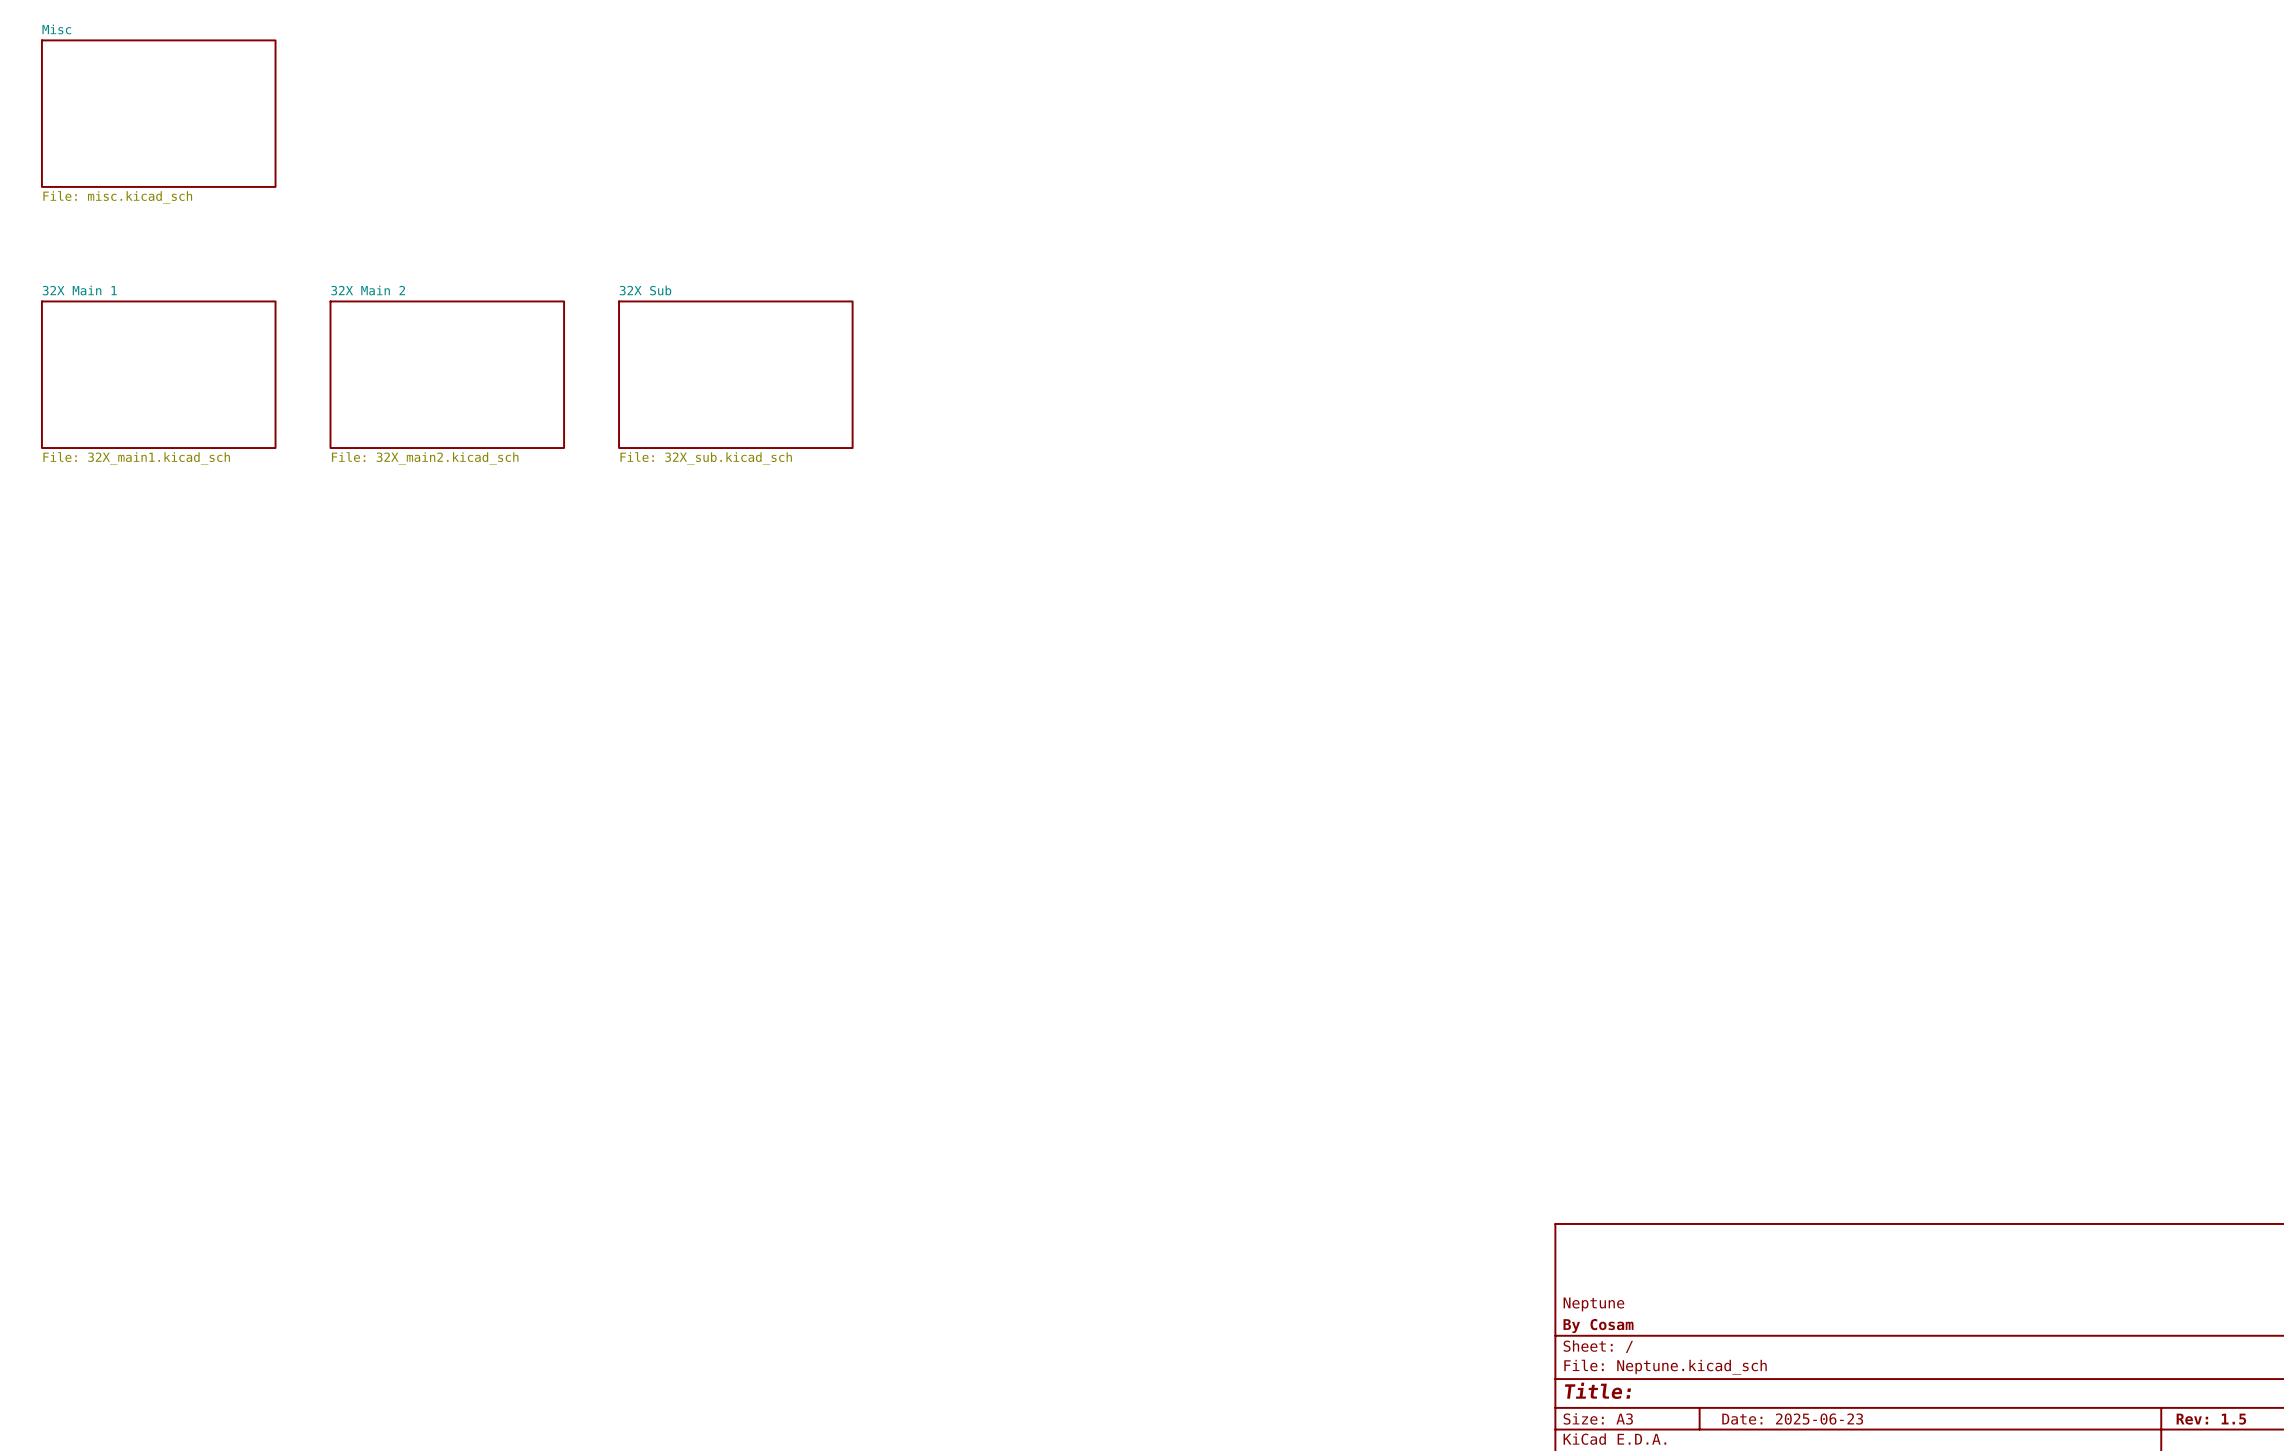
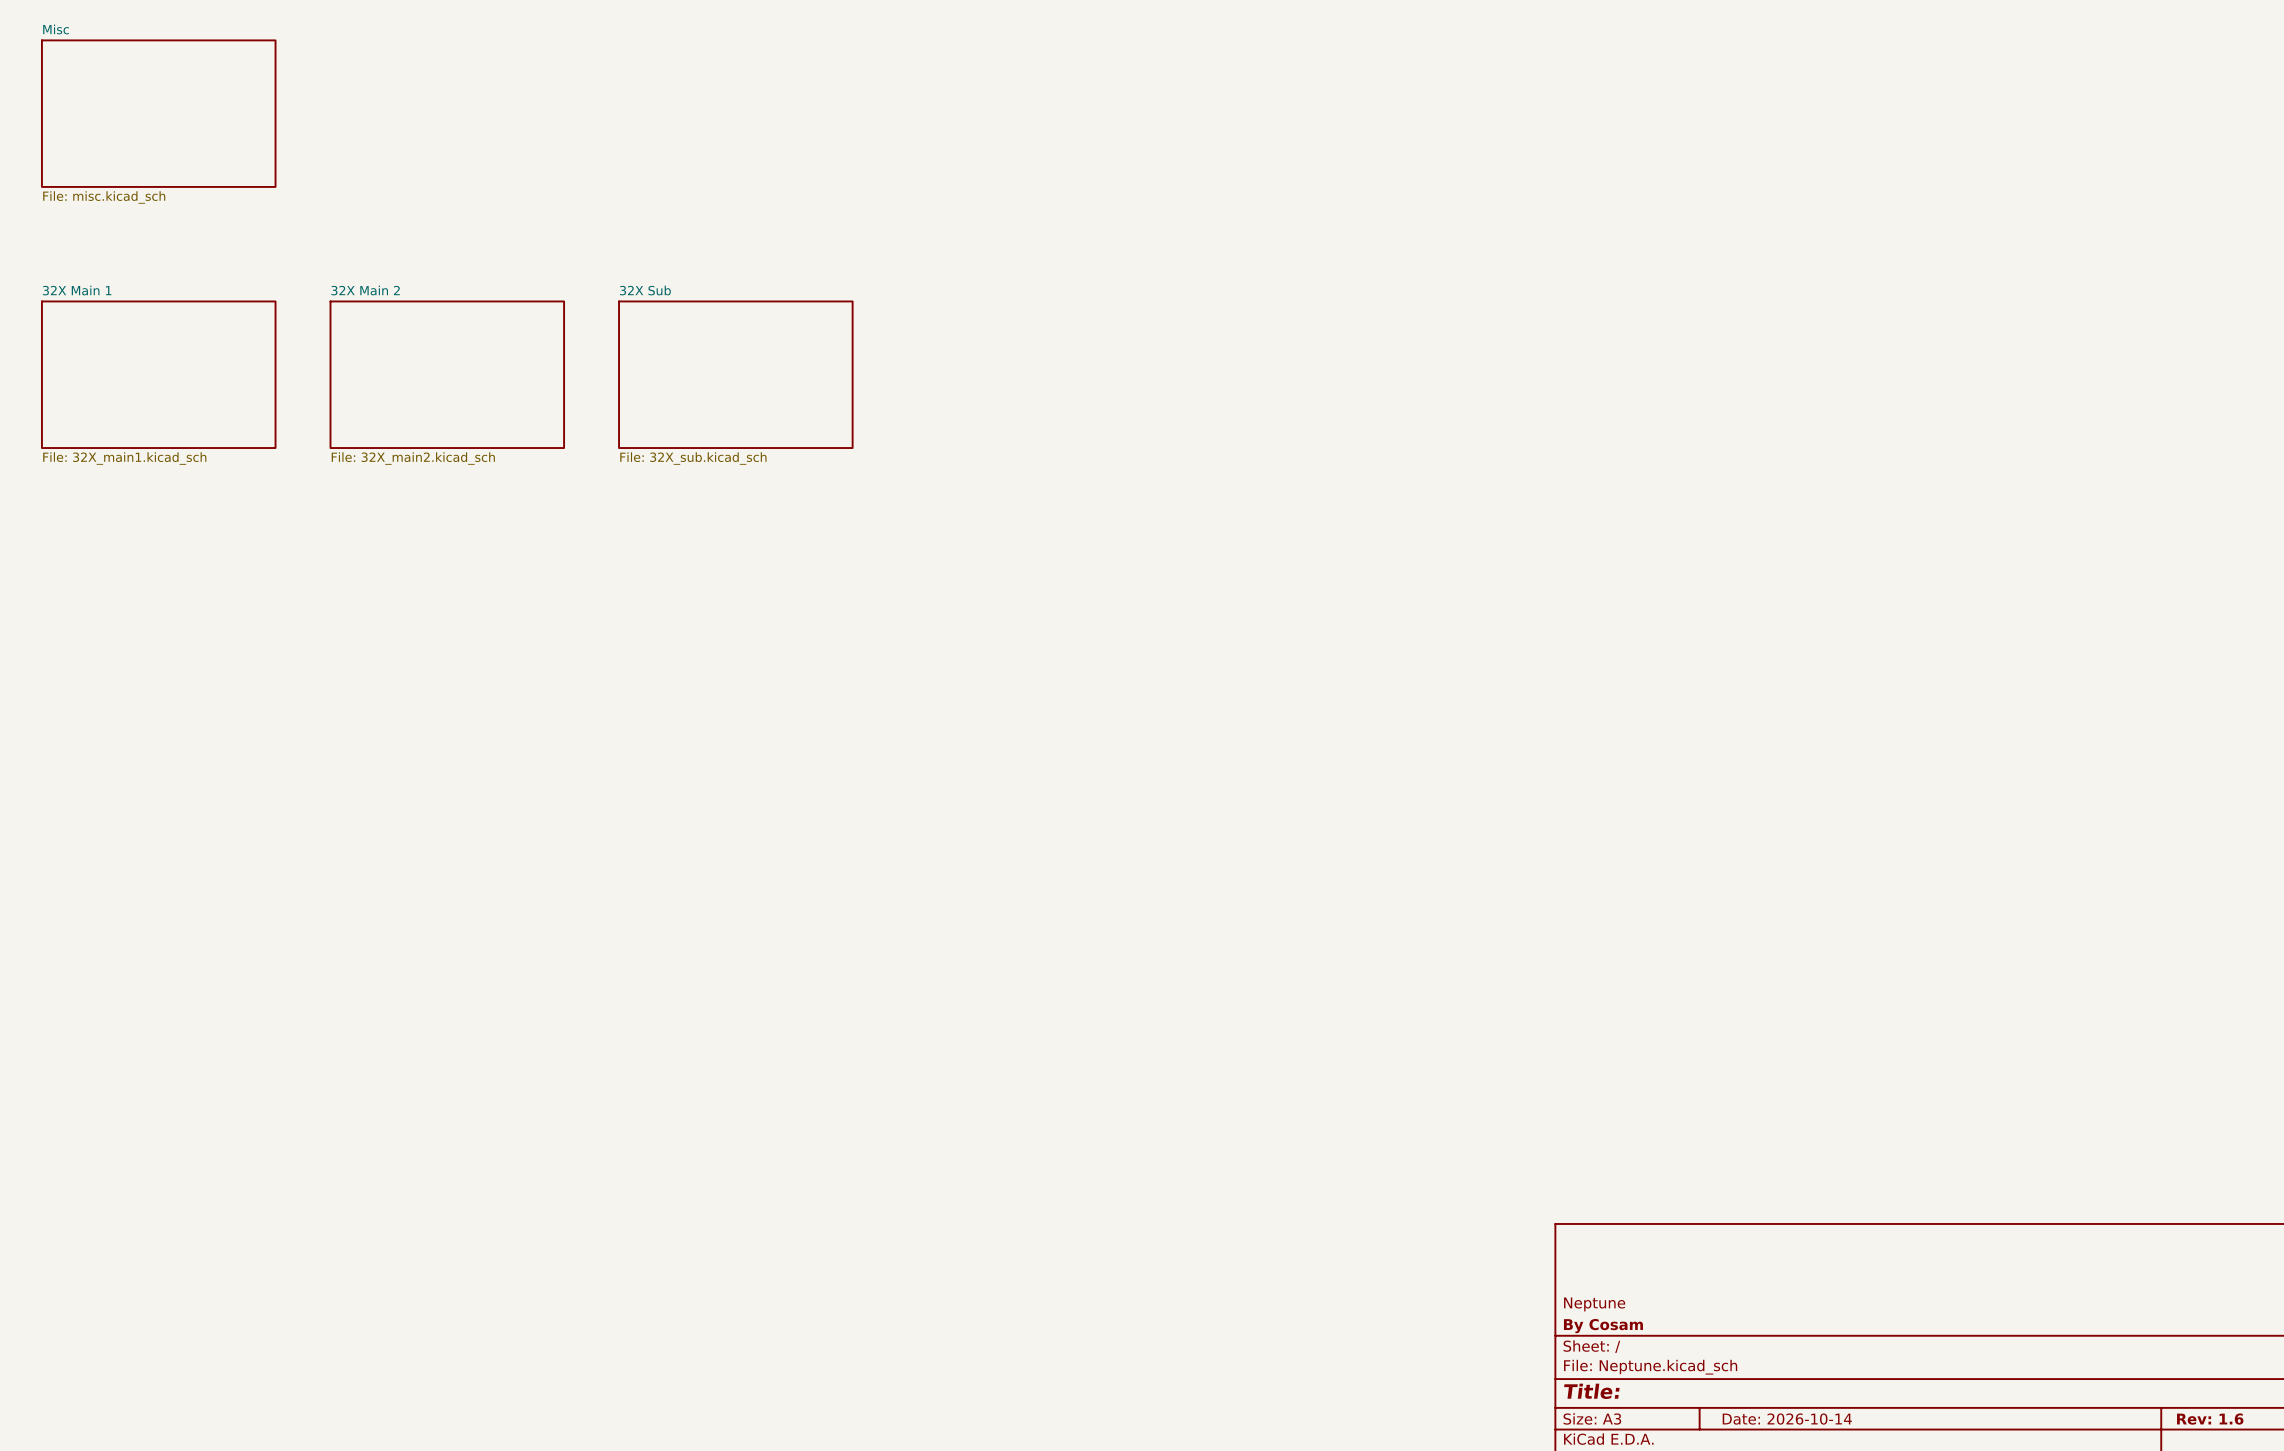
title block: Date: 2025-06-23 (1792, 1419) -> Date: 2026-10-14 (1787, 1419)
title block: Rev: 1.5 (2211, 1419) -> Rev: 1.6 (2210, 1419)

